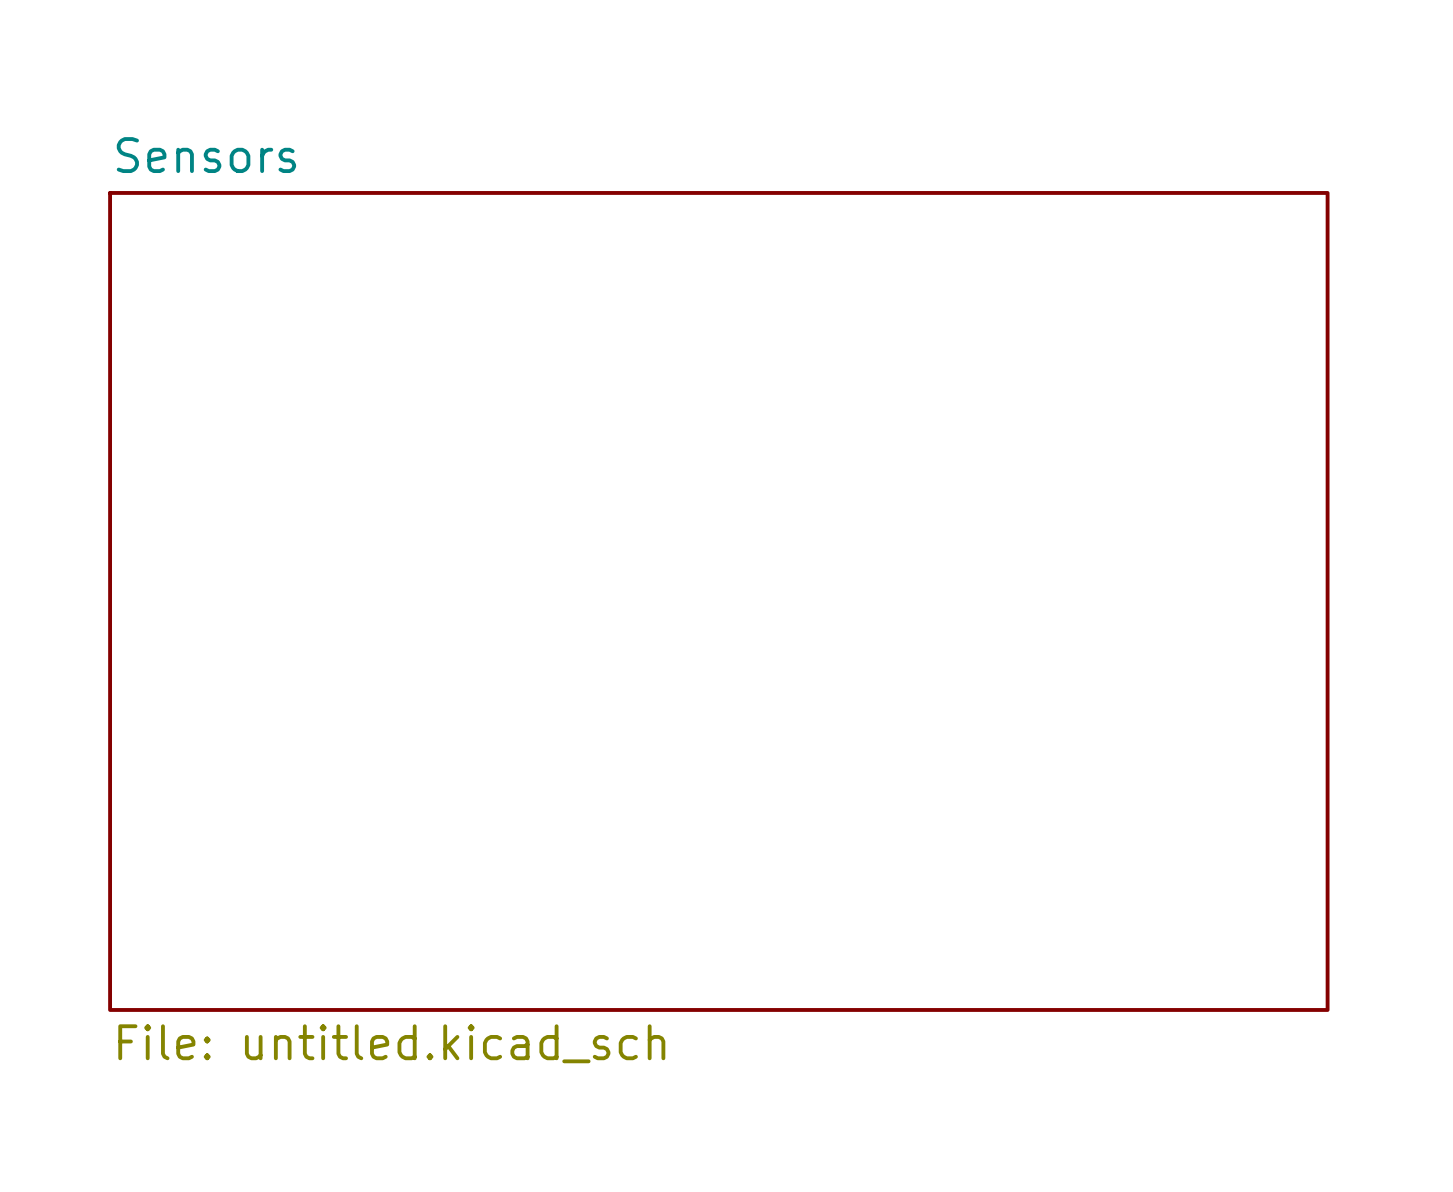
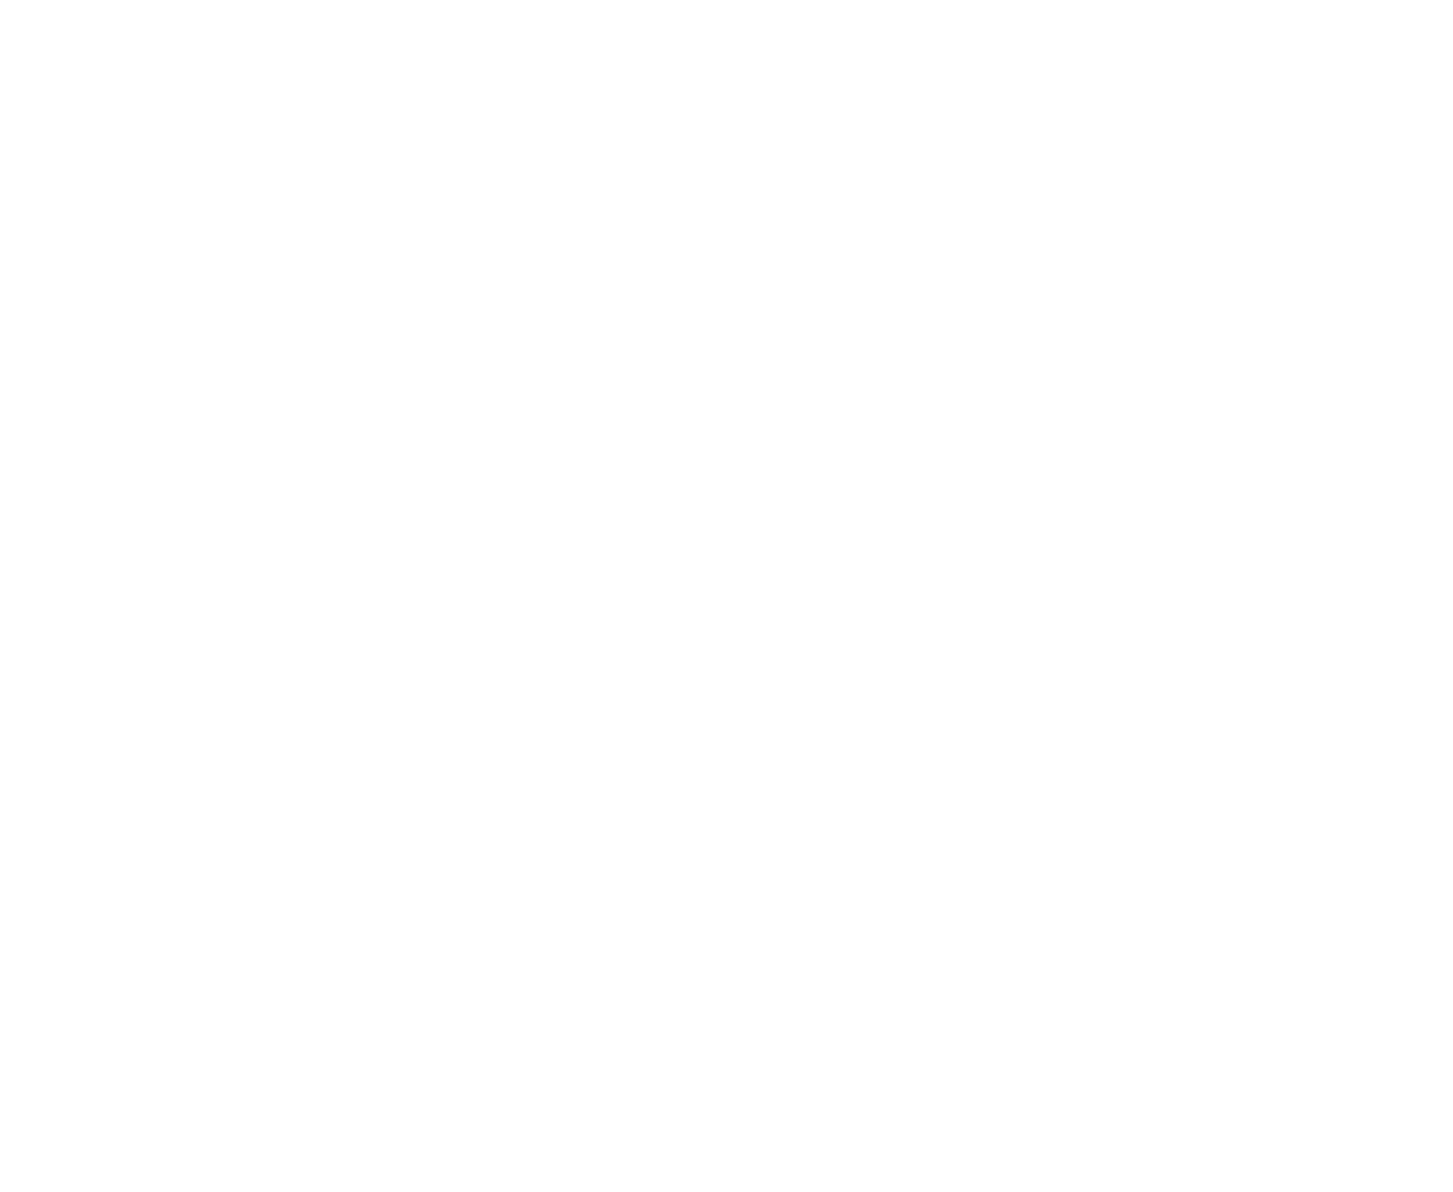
sheet Sensors: File: untitled.kicad_sch (718, 601) -> none

